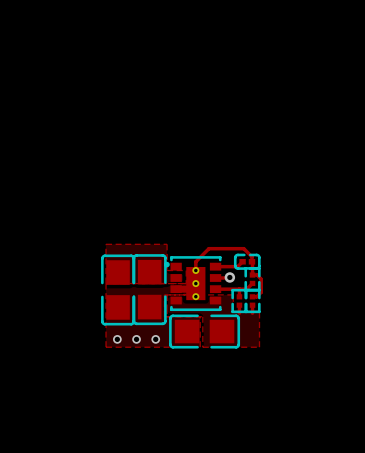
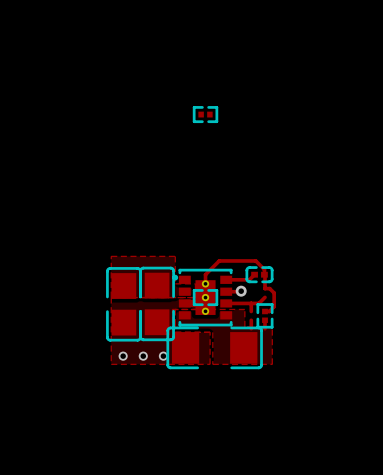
part: none -> (205, 114)
part: (252, 279) -> none
part: none -> (205, 297)
part: (239, 301) -> none
part footprint: [169, 314, 241, 349] -> [166, 326, 263, 370]

